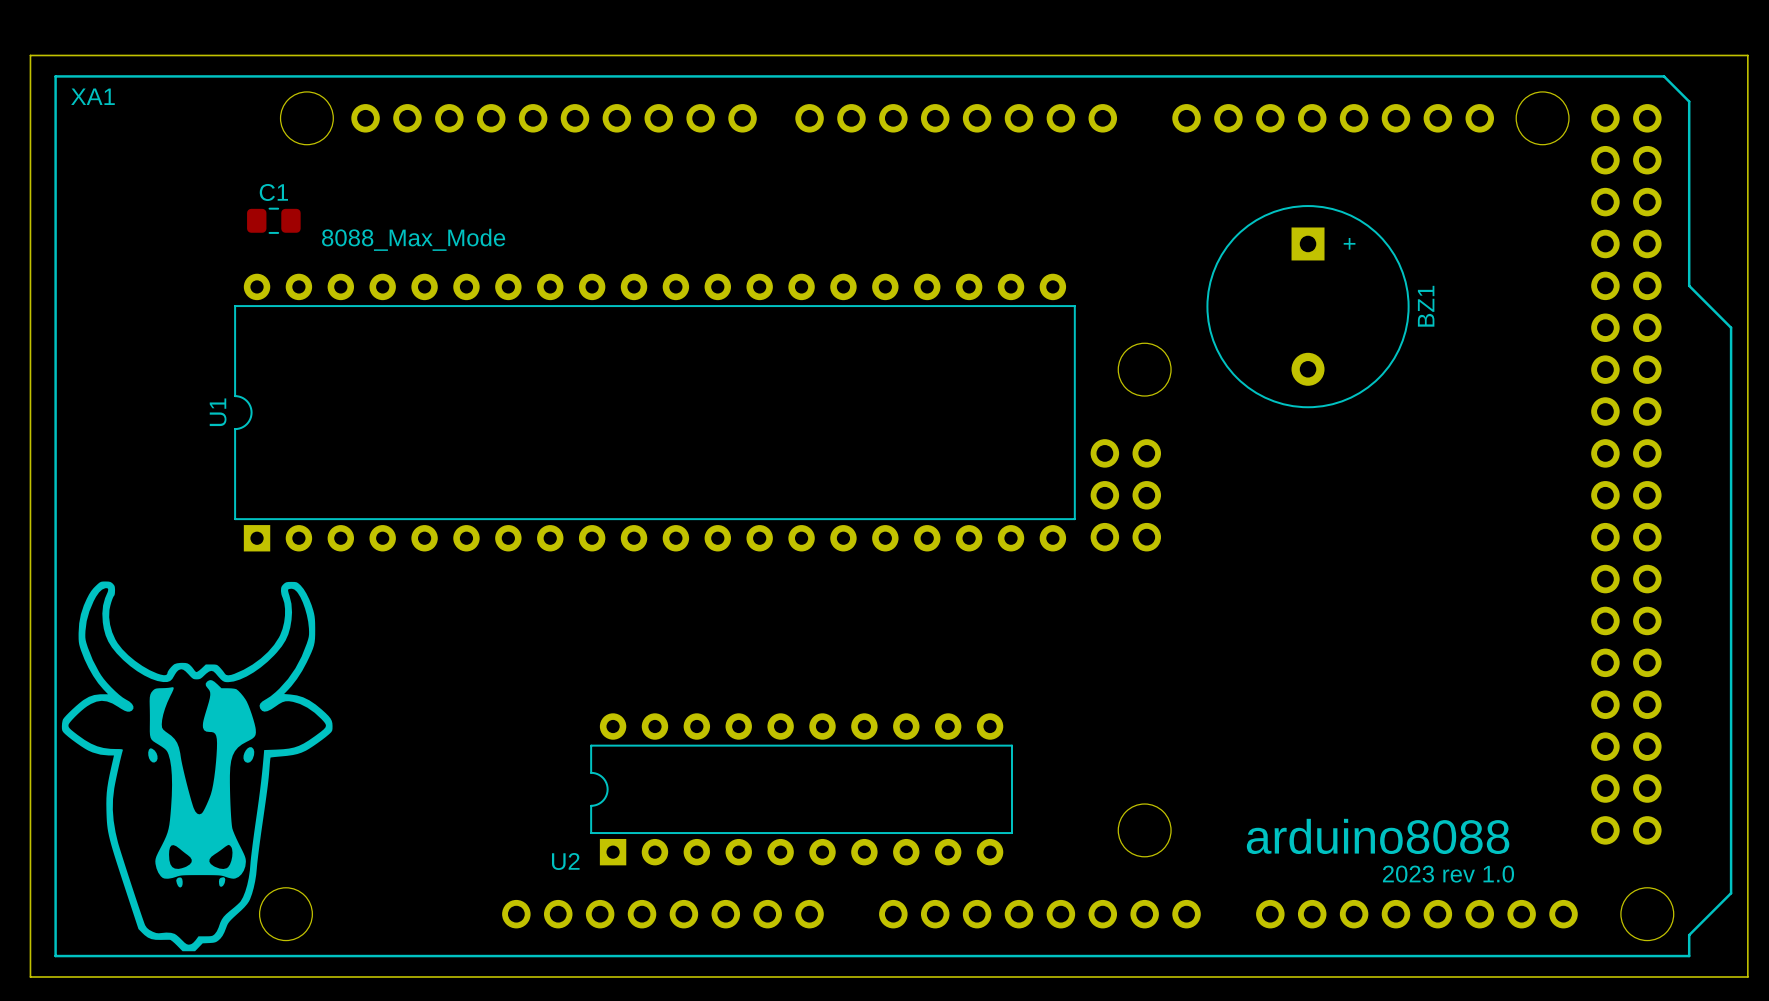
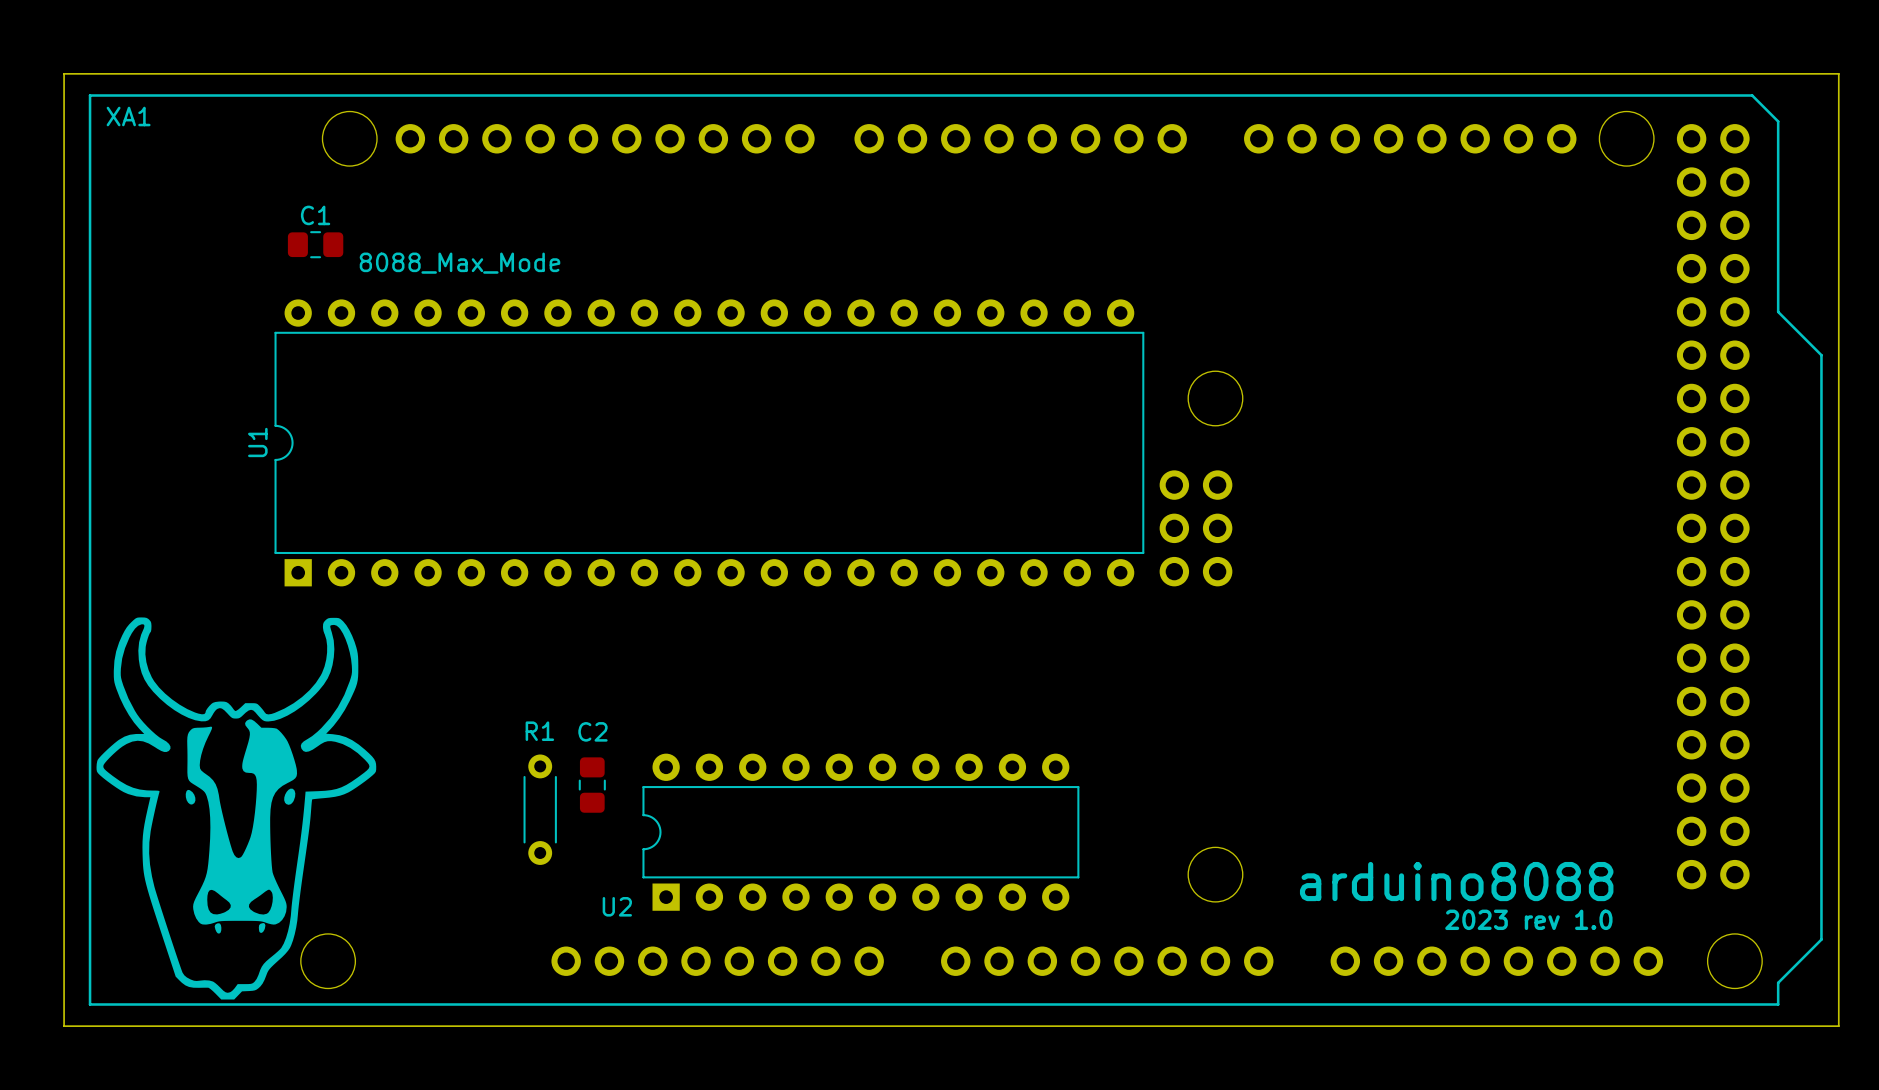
BZ1: (1308, 306) -> none
C2: none -> (592, 785)
R1: none -> (540, 809)

